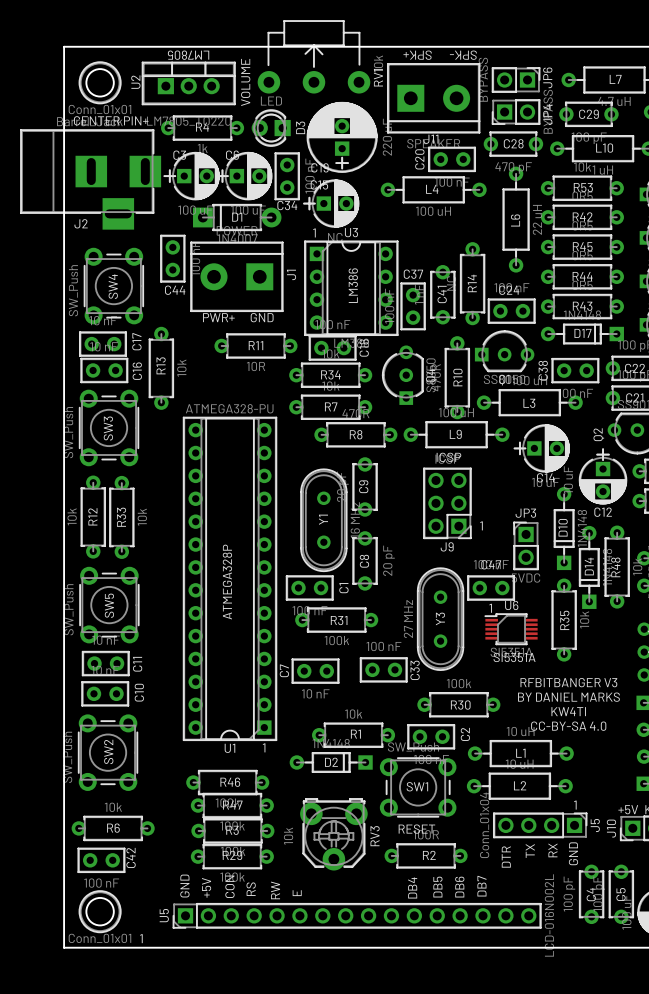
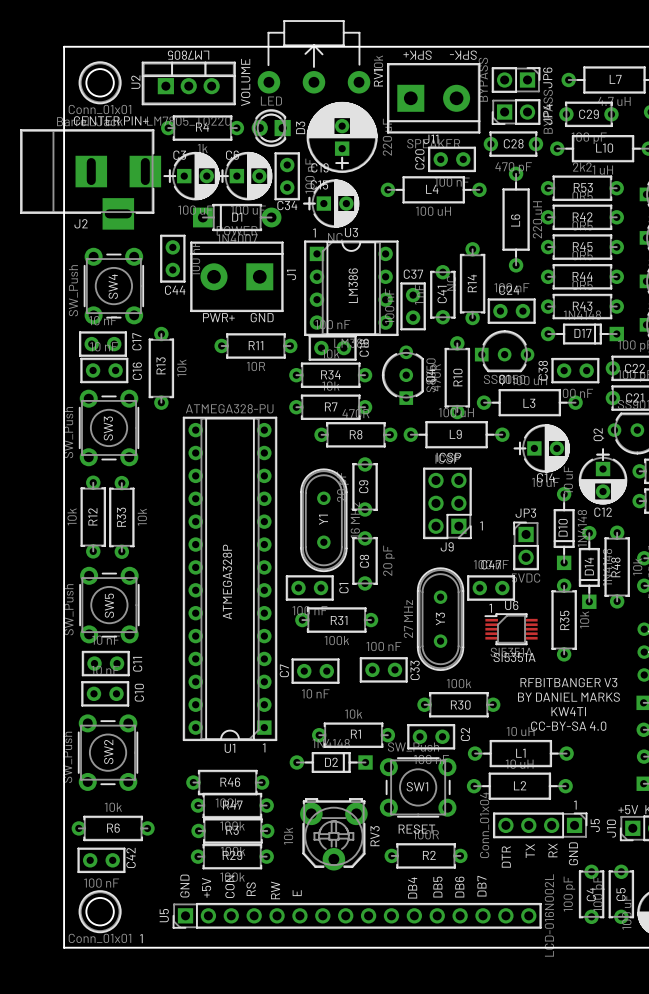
R53 value: 10k (582, 167) -> 2k2 (582, 167)
L6 value: 22 uH (537, 219) -> 220 uH (537, 219)

